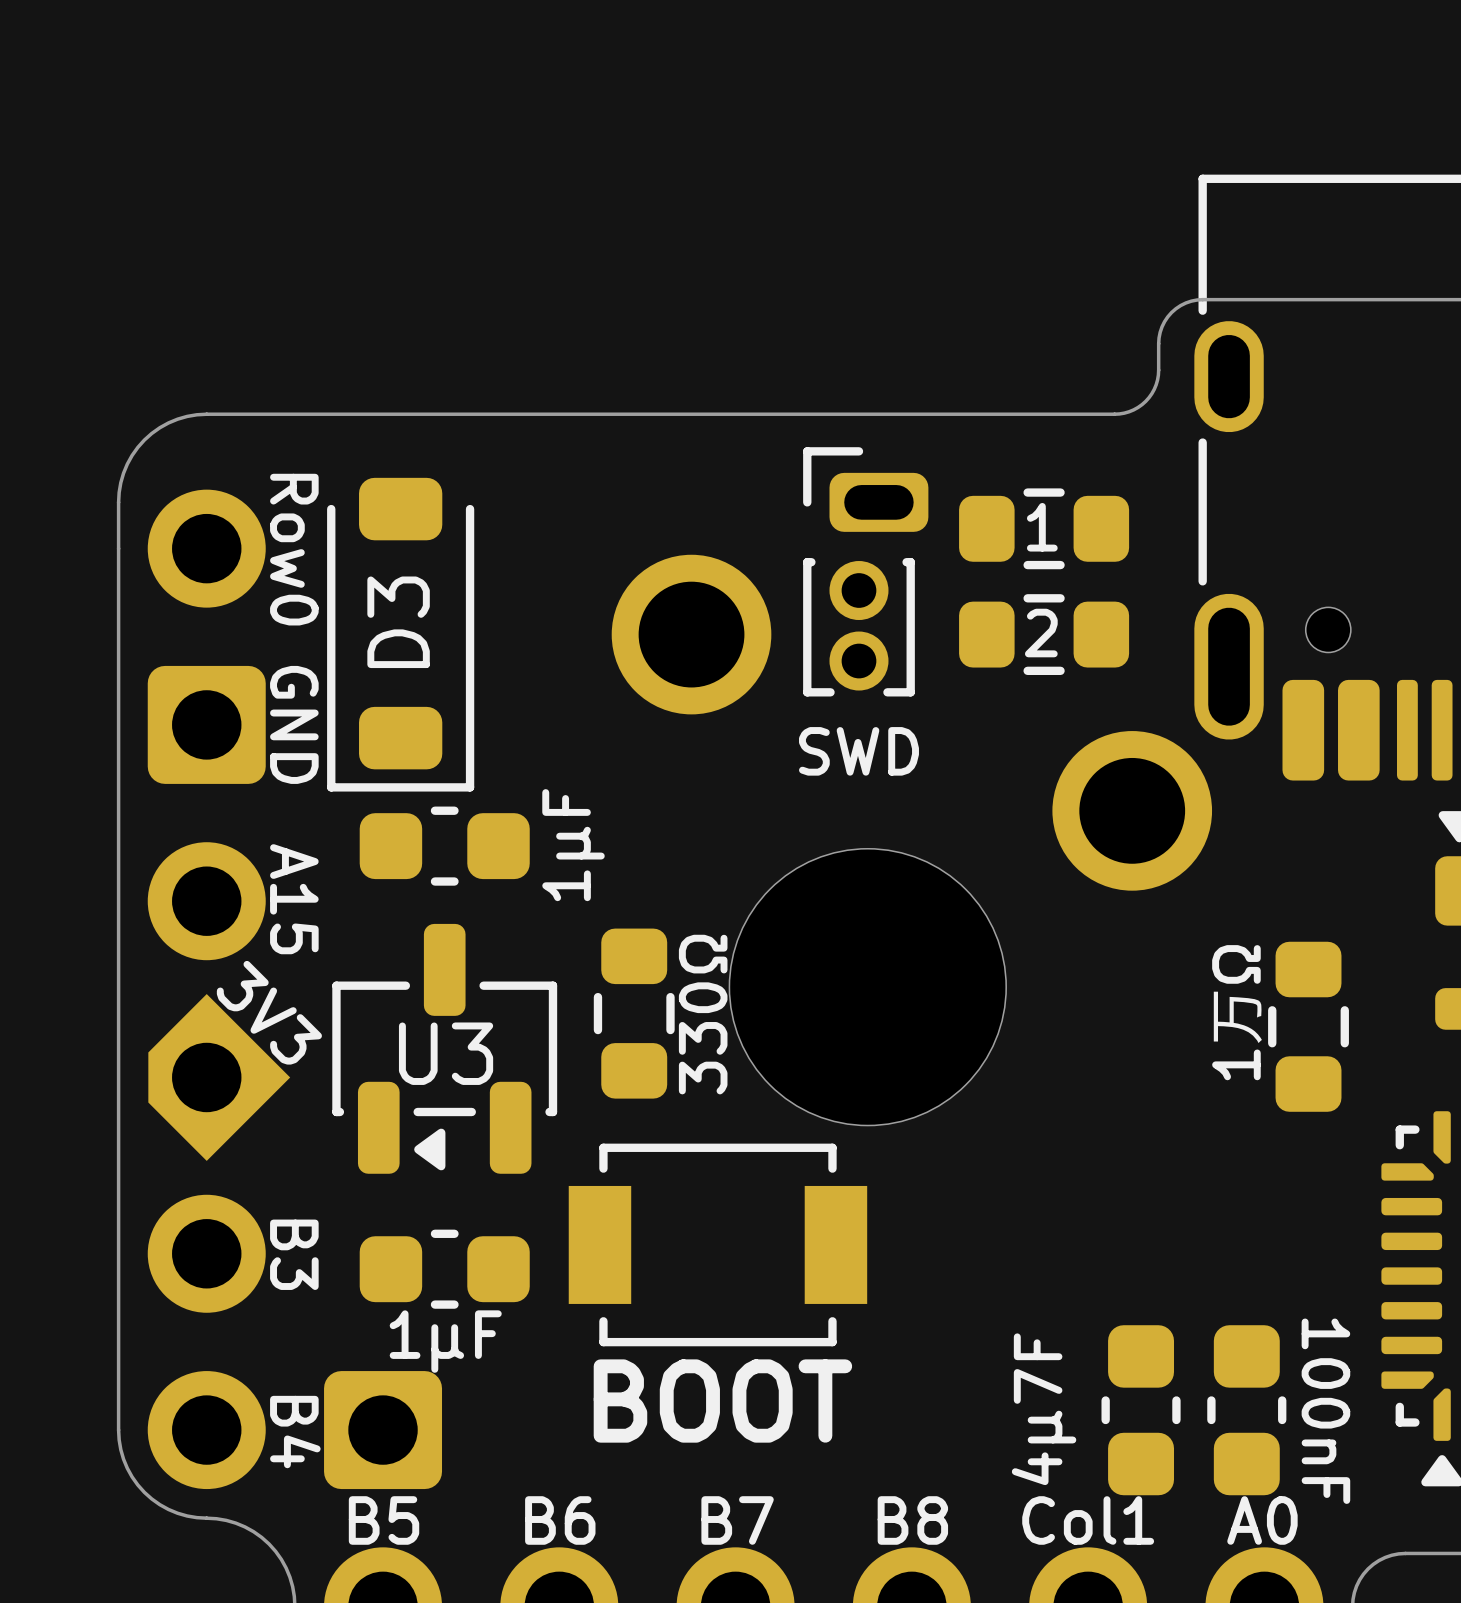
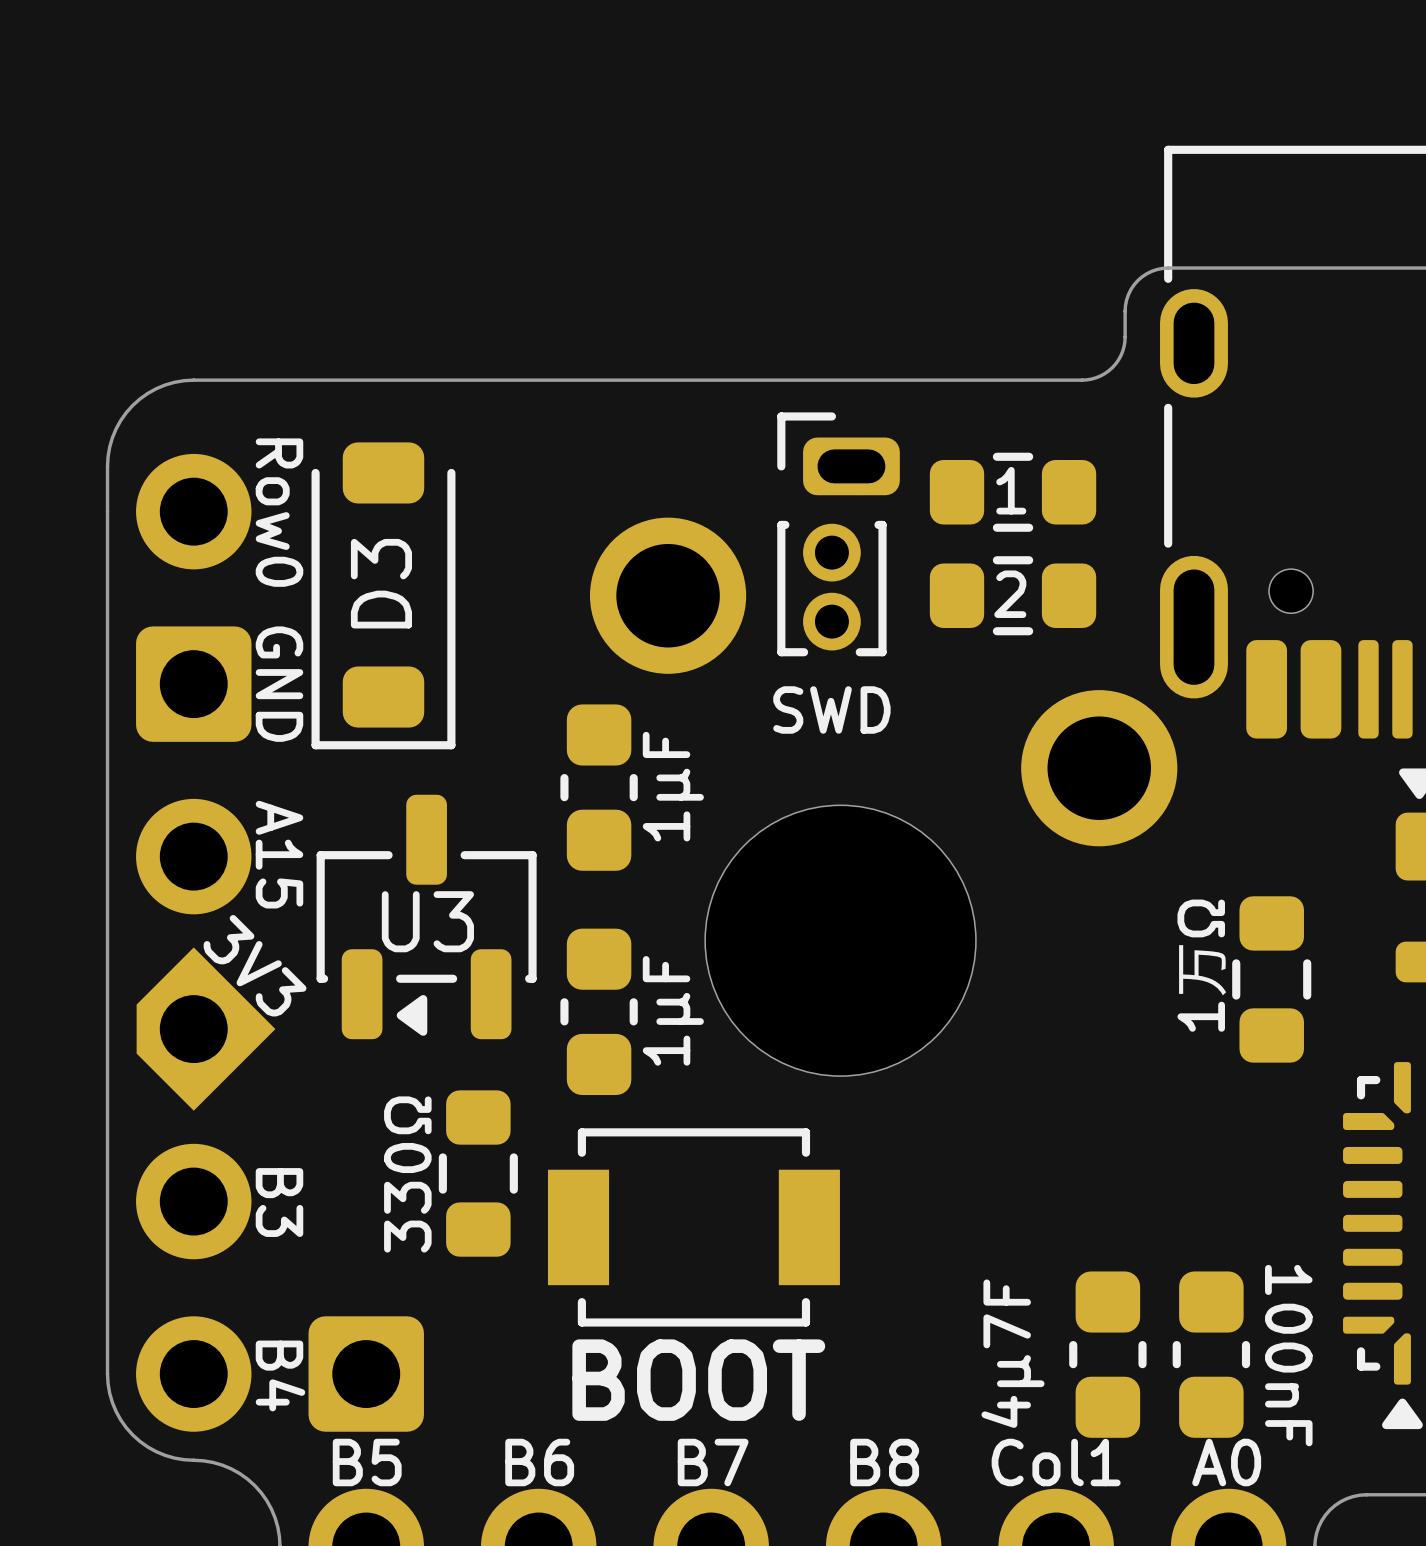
part rotation: 0° (444, 846) -> 90° clockwise (599, 787)
part position: (444, 846) -> (599, 787)
part footprint: [593, 928, 675, 1099] -> [560, 928, 638, 1096]
part value: 330Ω (703, 1014) -> 1µF (673, 1010)
U3 position: (444, 1048) -> (426, 916)
part footprint: [359, 1229, 530, 1309] -> [438, 1090, 518, 1257]
part position: (717, 1244) -> (693, 1227)
part value: 1µF (445, 1341) -> 330Ω (407, 1174)

